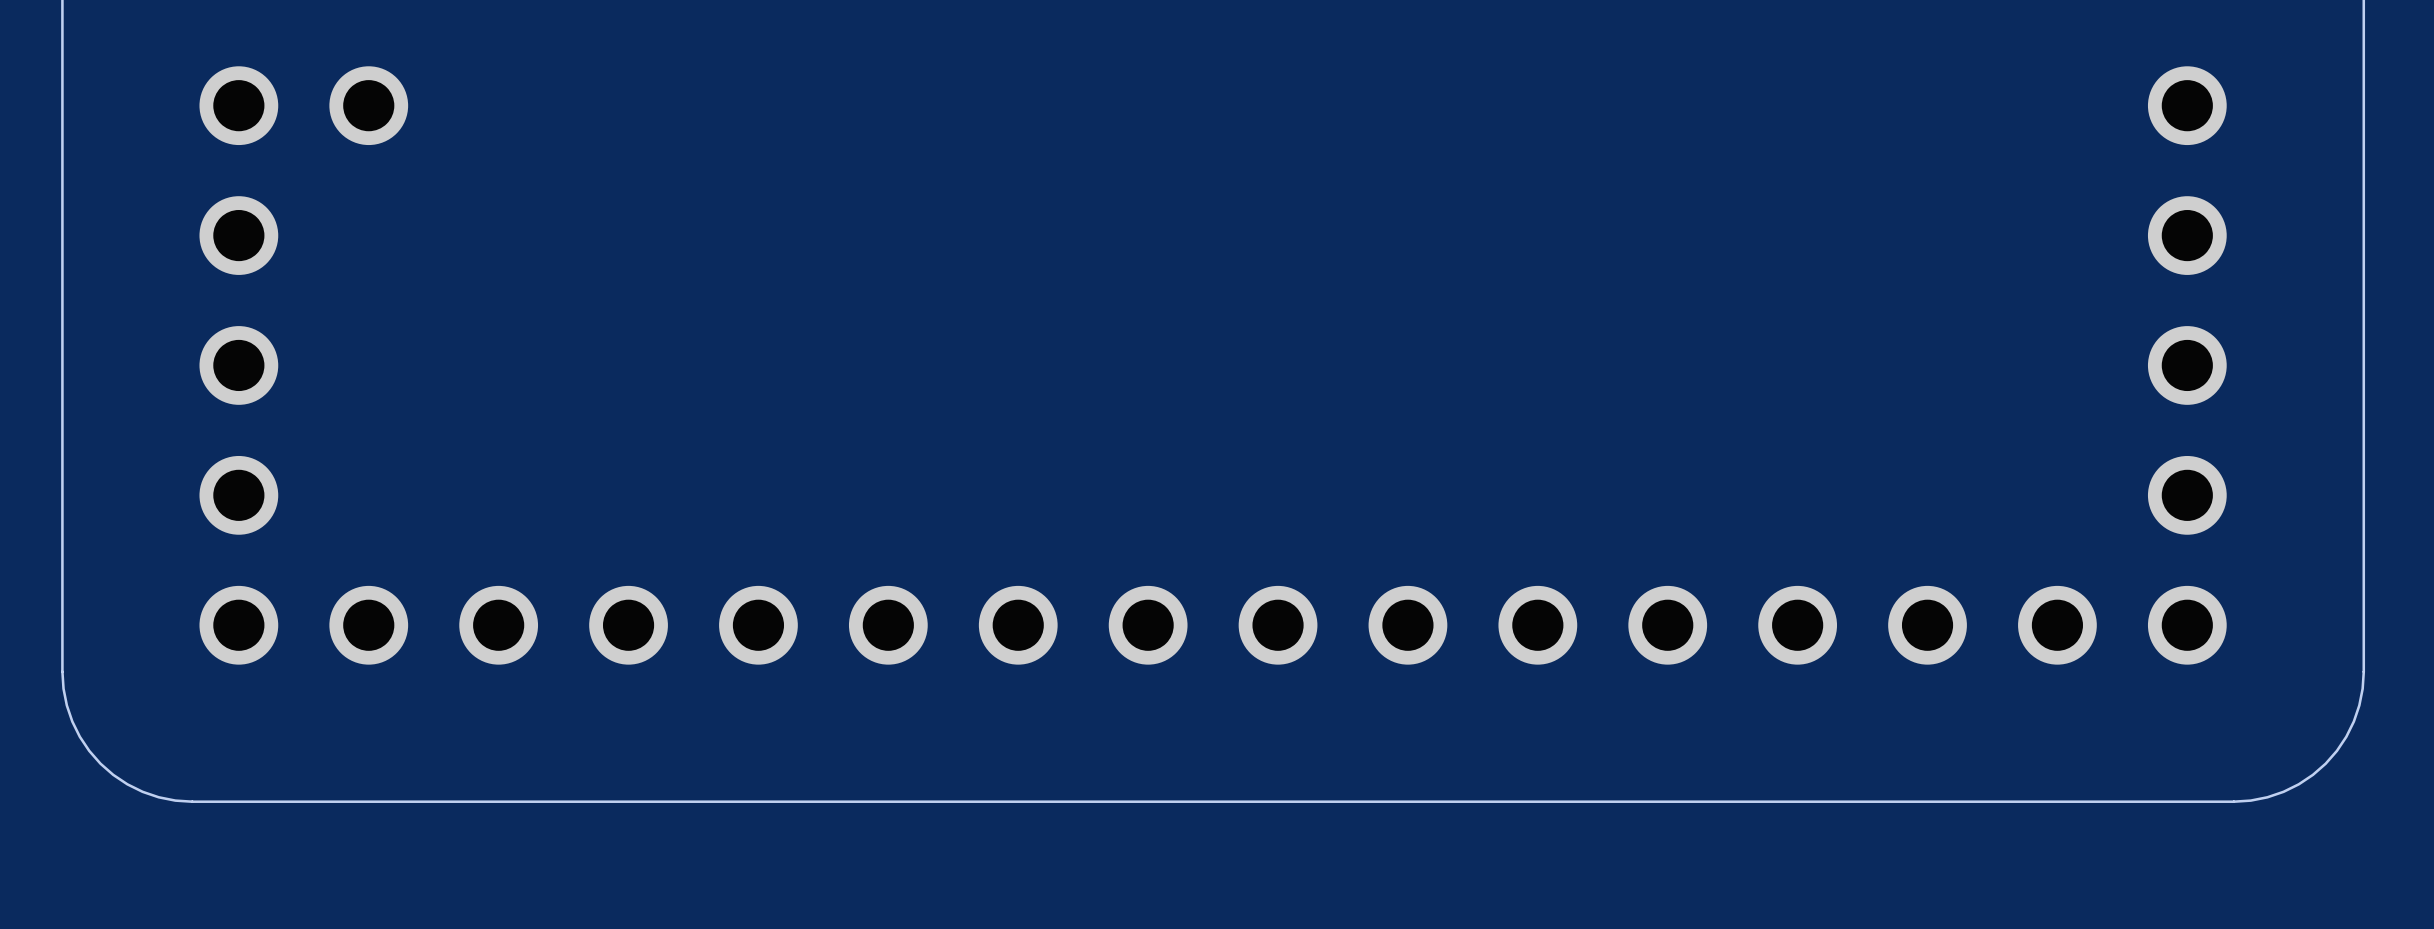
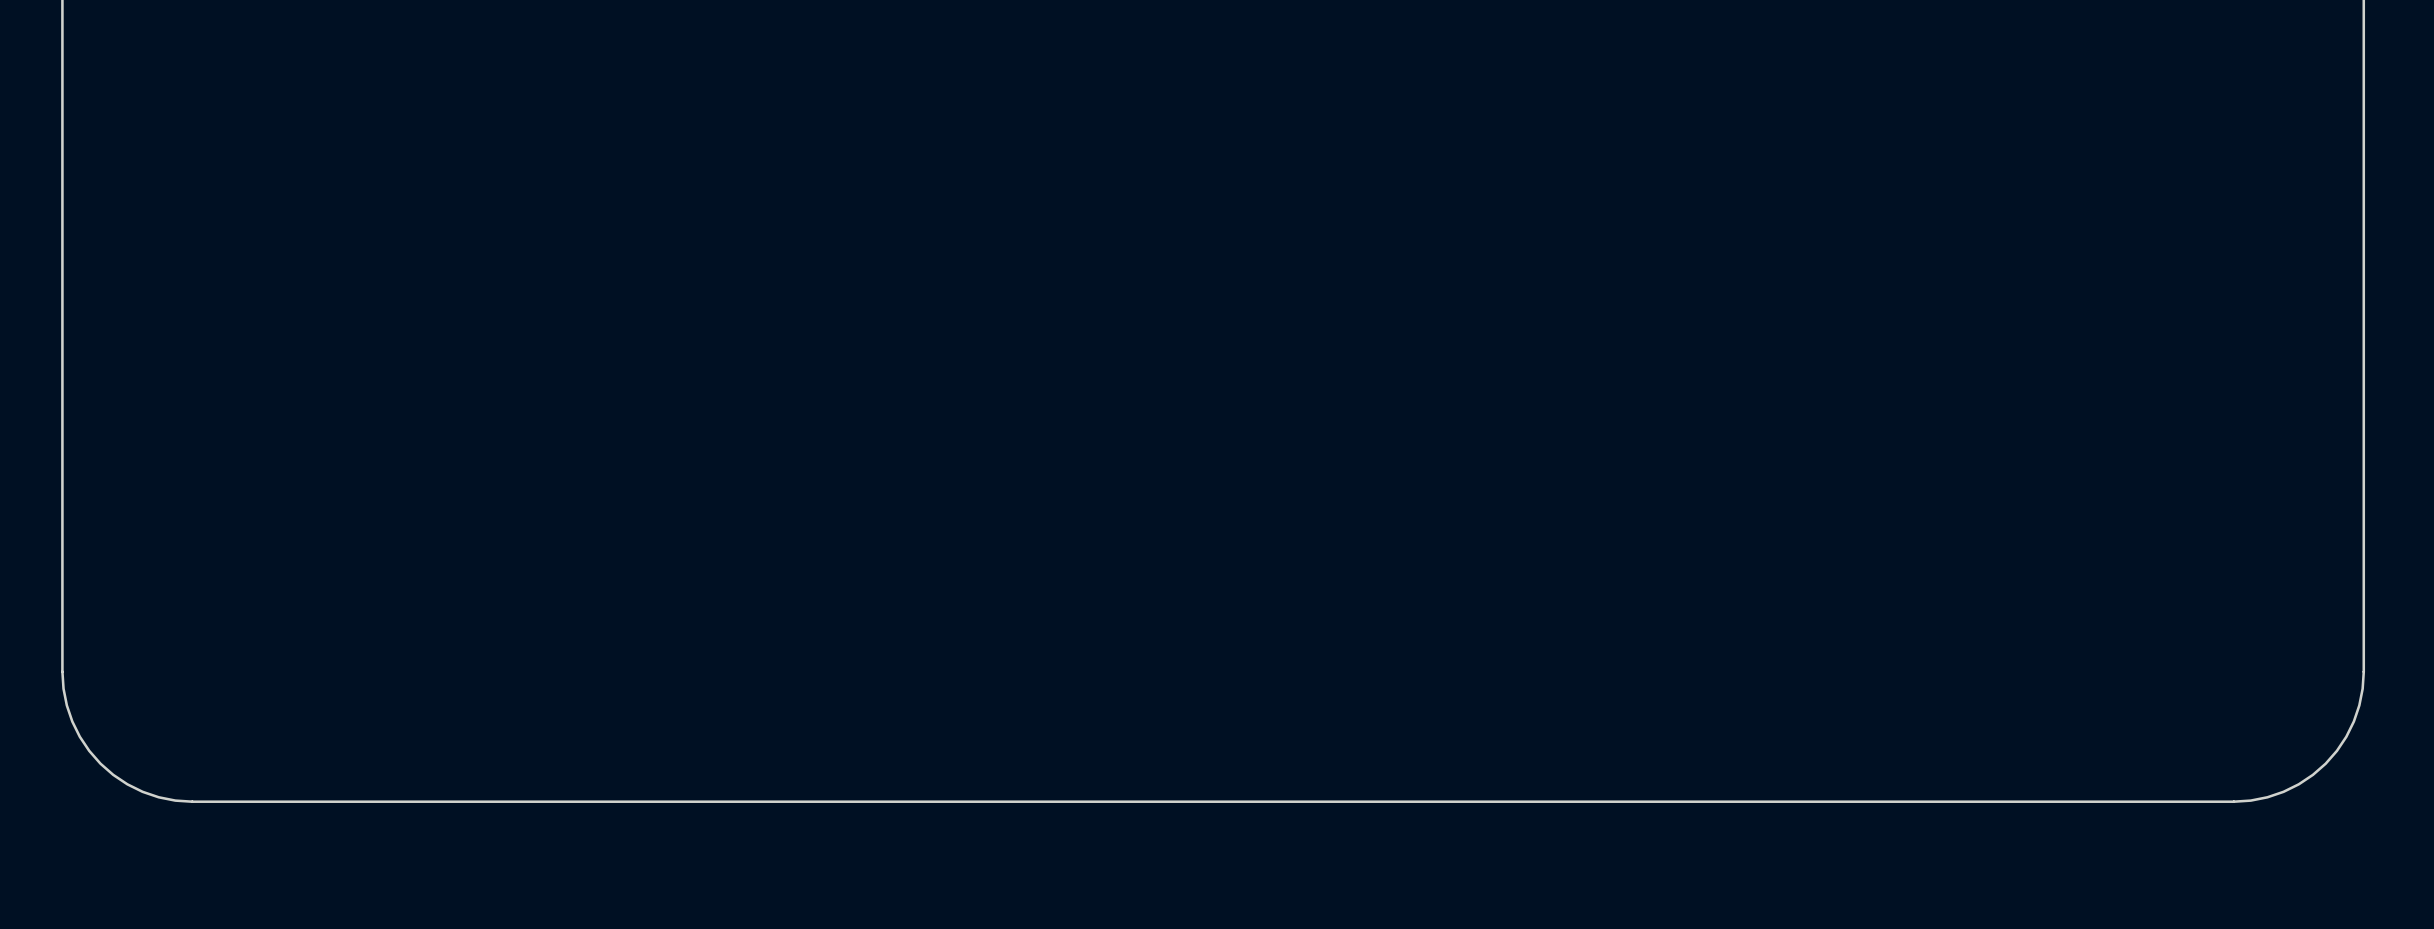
part: (303, 300) -> none
part: (2187, 300) -> none
part: (1213, 625) -> none

